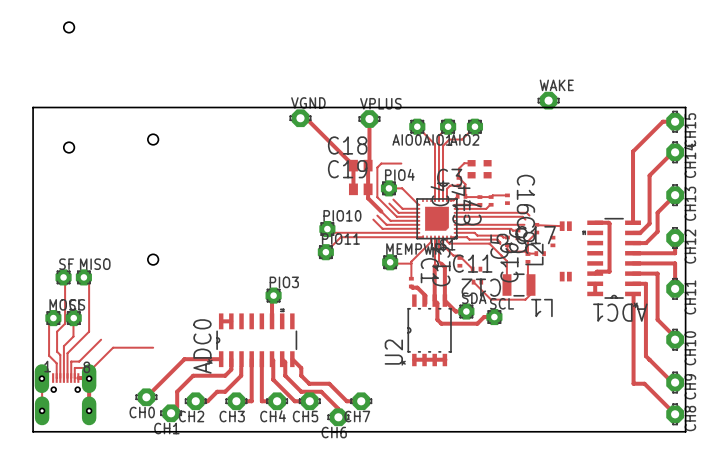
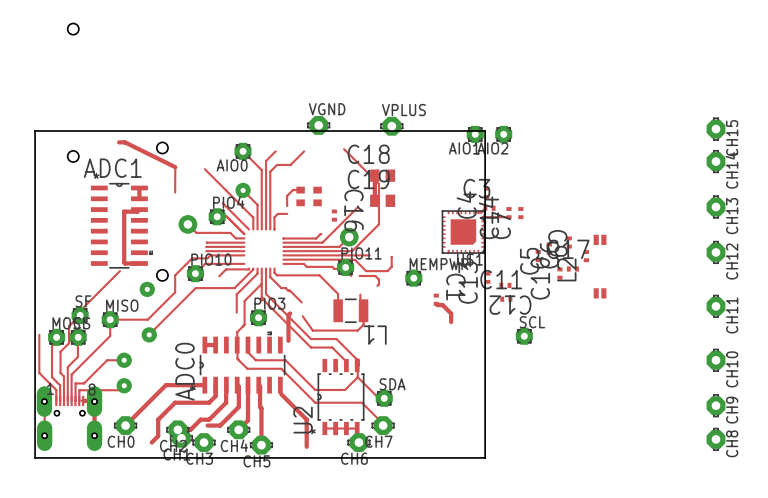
WAKE: (548, 100) -> none
track: (300, 118) (306, 118) (353, 165) -> none
track: (369, 119) (368, 198) (390, 220) (418, 220) -> none
track: (675, 121) (662, 121) (633, 151) (633, 222) -> none
board edge: (33, 123) (33, 107) (685, 107) (685, 431) (457, 431) -> (35, 131) (485, 131) (485, 457)
track: (417, 126) (434, 144) (434, 200) -> (243, 151) (261, 170) (261, 229)
AIO0 position: (417, 126) -> (243, 151)
track: (448, 126) (439, 135) (439, 200) -> (275, 151) (266, 161) (266, 229)
track: (474, 126) (462, 139) (449, 139) (443, 145) (443, 200) -> (304, 151) (290, 164) (277, 164) (270, 171) (270, 229)
track: none -> (119, 142) (125, 142) (175, 167) (175, 192)
track: none -> (344, 149) (378, 184) (378, 224) (352, 251) (283, 251)
track: (673, 151) (649, 175) (649, 223) (640, 232) (633, 232) -> none
track: none -> (204, 169) (253, 217) (253, 229)
track: (401, 163) (381, 163) (377, 167) (377, 197) (396, 216) (418, 216) -> none
track: (471, 163) (464, 163) (458, 168) (458, 177) (465, 184) (466, 197) (479, 196) -> none
part position: (479, 169) -> (309, 196)
track: none -> (139, 188) (139, 198)
track: none -> (243, 190) (257, 204) (257, 229)
via: none -> (243, 190)
track: none -> (300, 190) (292, 190) (287, 195) (287, 205)
track: (459, 185) (450, 185) (446, 188) (446, 200) -> (287, 213) (277, 213) (274, 217) (274, 229)
track: (388, 188) (402, 188) (418, 204) -> none
PIO4 position: (388, 188) -> (217, 216)
track: none -> (222, 203) (249, 229)
track: none -> (357, 207) (322, 242) (283, 242)
track: (507, 195) (479, 197) -> none
track: (675, 195) (657, 212) (657, 231) (646, 243) (633, 243) -> none
track: none -> (139, 209) (137, 211) (124, 211) (124, 262) (139, 263)
track: (393, 199) (402, 208) (418, 208) -> none
C16 position: (507, 199) -> (334, 215)
track: none -> (217, 215) (226, 215) (244, 234)
track: (389, 203) (398, 212) (418, 212) -> none
track: (491, 204) (486, 208) (455, 208) -> (321, 234) (316, 238) (283, 238)
track: none -> (187, 224) (196, 232) (230, 232) (235, 238) (244, 238)
via: none -> (187, 224)
track: (455, 212) (526, 212) (529, 215) -> none
track: (377, 215) (386, 224) (418, 224) -> none
track: (455, 216) (522, 216) (525, 219) -> none
track: (373, 219) (382, 228) (418, 228) -> none
track: (595, 222) (609, 223) (609, 271) (597, 271) (595, 273) -> none
track: none -> (349, 237) (339, 246) (283, 246)
via: none -> (349, 237)
track: (455, 224) (524, 224) -> none
track: (536, 224) (562, 226) -> none
track: none -> (206, 242) (244, 242)
track: (455, 228) (511, 228) (517, 230) -> none
track: (327, 229) (331, 232) (418, 232) -> none
PIO10 position: (327, 229) -> (195, 273)
track: none -> (206, 246) (244, 246)
track: (455, 232) (474, 232) (477, 235) (501, 235) (507, 237) -> none
track: (536, 232) (527, 241) (527, 254) (525, 251) (509, 251) (507, 245) -> none
track: none -> (206, 251) (244, 251)
track: (422, 237) (340, 237) (325, 252) -> none
track: (430, 237) (430, 242) (411, 261) (411, 278) -> (257, 268) (257, 273) (236, 294) (236, 312)
track: (434, 237) (434, 300) (437, 303) (437, 319) (441, 323) (477, 323) (484, 317) (494, 317) -> none
track: (439, 237) (439, 261) (444, 267) (444, 300) (455, 311) (466, 311) -> none
track: (443, 237) (443, 245) (453, 255) (461, 258) (472, 269) -> (270, 268) (270, 277) (281, 288) (289, 290) (301, 302)
track: (447, 237) (449, 243) (489, 243) (506, 261) (506, 284) -> none
track: (451, 237) (497, 239) (500, 244) -> none
track: (675, 238) (675, 253) (633, 253) -> none
track: none -> (283, 255) (369, 255)
track: none -> (391, 256) (391, 266) (387, 271) (366, 271) (352, 259) (283, 259)
track: none -> (244, 263) (205, 263) (195, 273)
track: none -> (283, 263) (303, 263) (306, 266) (344, 268) (351, 275)
track: none -> (249, 268) (226, 269) (219, 276)
track: none -> (253, 268) (234, 288) (195, 288) (149, 334)
track: none -> (261, 268) (261, 299) (311, 347) (332, 347) (345, 360)
track: none -> (266, 268) (266, 294) (311, 339) (336, 339) (357, 360) (357, 377)
track: none -> (274, 268) (277, 275) (319, 275) (338, 293) (338, 319) (338, 310)
track: (527, 253) (536, 253) -> none
ADC1 rotation: 0° (611, 258) -> 180° (121, 225)
ADC1 position: (611, 258) -> (121, 225)
track: none -> (359, 275) (375, 275) (378, 279) (377, 285)
track: (527, 261) (527, 281) (530, 285) (530, 294) (525, 299) (491, 299) (473, 282) -> none
track: (390, 262) (411, 263) -> none
track: (633, 263) (675, 263) (675, 288) -> none
track: none -> (261, 283) (244, 301) (244, 324) (237, 332) (237, 358) (247, 368) (281, 368) (315, 402) (361, 402) (384, 425)
via: none -> (147, 289)
track: (633, 273) (657, 273) (657, 319) (675, 337) (675, 339) -> none
track: (63, 277) (65, 307) -> (119, 271) (80, 310) (80, 315) (69, 326)
SF position: (63, 277) -> (80, 315)
track: (83, 277) (89, 282) (89, 331) -> (244, 255) (210, 255) (207, 258) (192, 258) (175, 275) (175, 292) (147, 319) (110, 319) (110, 336) (94, 351)
MISO position: (83, 277) -> (110, 319)
track: none -> (360, 294) (360, 316) (363, 310) (363, 324) (357, 330) (312, 330) (302, 316)
track: (595, 283) (595, 293) -> none
track: (633, 283) (645, 283) (645, 356) (672, 382) (675, 382) -> none
L1 position: (518, 285) -> (350, 310)
track: (633, 293) (633, 383) (644, 383) (675, 414) -> none
PIO3 position: (273, 295) -> (258, 317)
SDA position: (466, 311) -> (384, 398)
track: none -> (39, 334) (39, 373) (56, 390) (56, 400)
via: none -> (149, 334)
track: (221, 321) (231, 321) -> (204, 345) (215, 345)
track: none -> (247, 345) (247, 352) (255, 360) (285, 360) (315, 389) (345, 389) (357, 377)
U2 position: (429, 330) -> (341, 397)
ADC0 position: (256, 337) -> (242, 362)
track: none -> (107, 360) (124, 360)
via: none -> (124, 360)
track: (153, 347) (113, 347) (92, 367) -> (124, 385) (124, 390) (98, 390)
track: none -> (357, 377) (378, 398) (384, 398)
track: (221, 359) (184, 359) (146, 397) -> (204, 385) (165, 385) (125, 425)
track: (231, 359) (231, 369) (225, 375) (193, 375) (177, 391) (177, 407) (171, 413) -> (215, 385) (215, 396) (209, 402) (175, 402) (158, 419) (158, 436) (151, 442)
track: (251, 359) (251, 401) (236, 401) -> none
track: (261, 359) (261, 401) (277, 401) -> none
track: (272, 359) (273, 379) -> (281, 394) (289, 402)
track: (282, 359) (285, 362) (285, 375) (301, 391) (321, 391) (338, 408) (338, 417) -> none
track: (292, 359) (301, 368) (301, 375) (309, 383) (329, 383) (346, 401) (361, 401) -> none
track: (445, 359) (414, 360) (444, 360) -> none
via: none -> (124, 385)
track: none -> (247, 385) (247, 420) (238, 429)
track: none -> (258, 385) (261, 408) (261, 445)
track: (241, 367) (241, 375) (225, 391) (217, 391) -> (237, 385) (238, 386) (238, 406) (230, 415)
track: none -> (226, 394) (226, 402) (209, 419) (200, 419) (190, 429) (177, 429)
track: (289, 395) (294, 401) (309, 401) -> (306, 419) (306, 446)
CH0 position: (146, 397) -> (125, 425)
CH2 position: (195, 401) -> (177, 429)
CH3 position: (236, 401) -> (204, 442)
CH4 position: (277, 401) -> (238, 429)
CH5 position: (309, 401) -> (261, 445)
track: none -> (324, 428) (357, 428)

